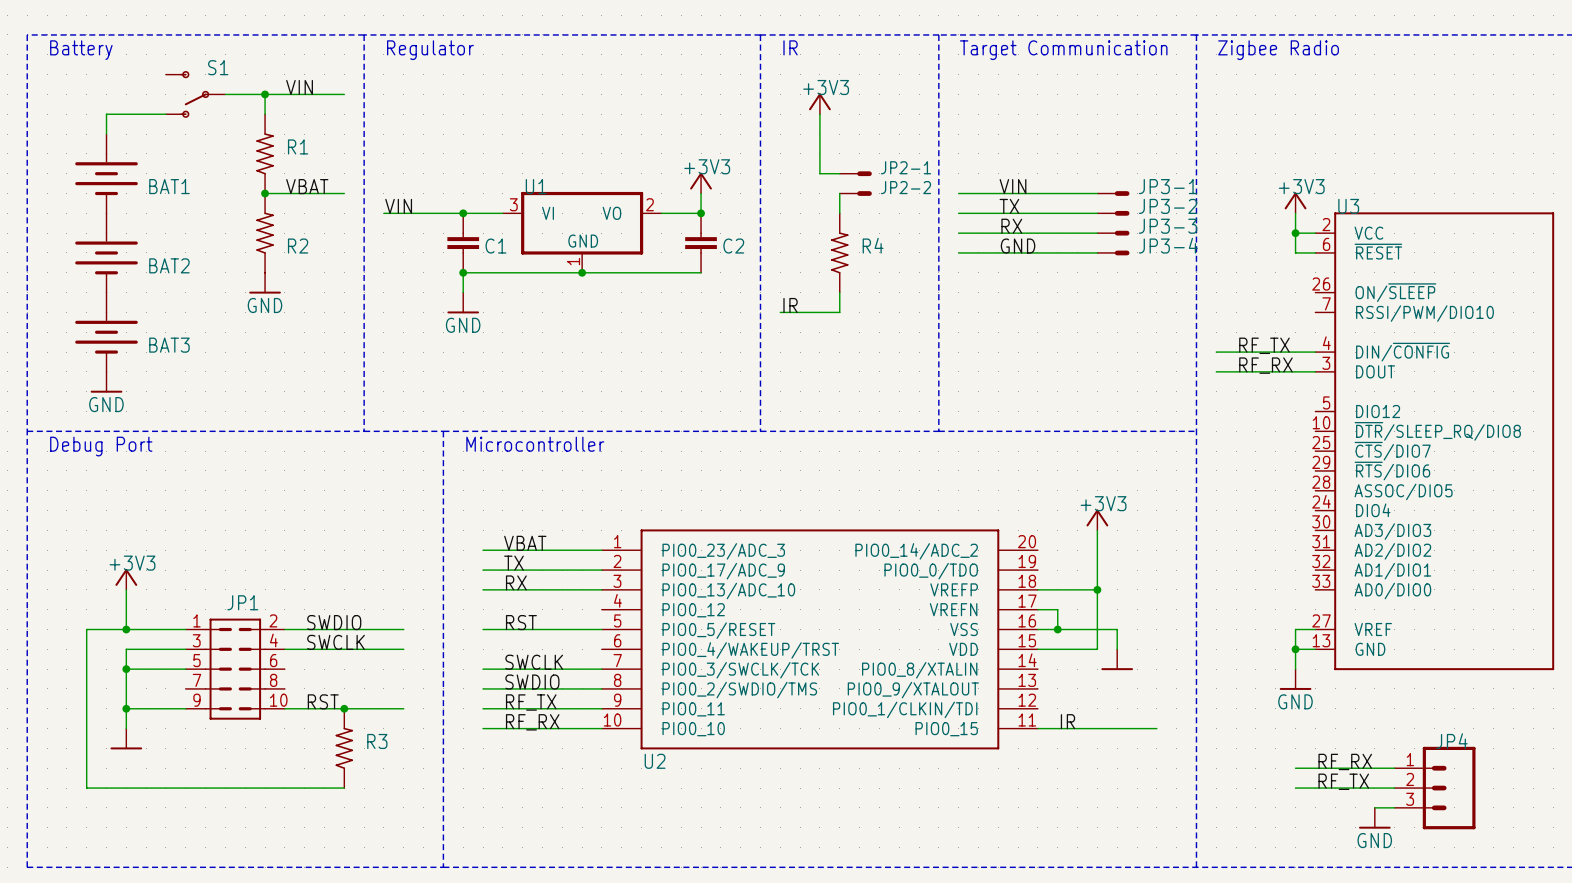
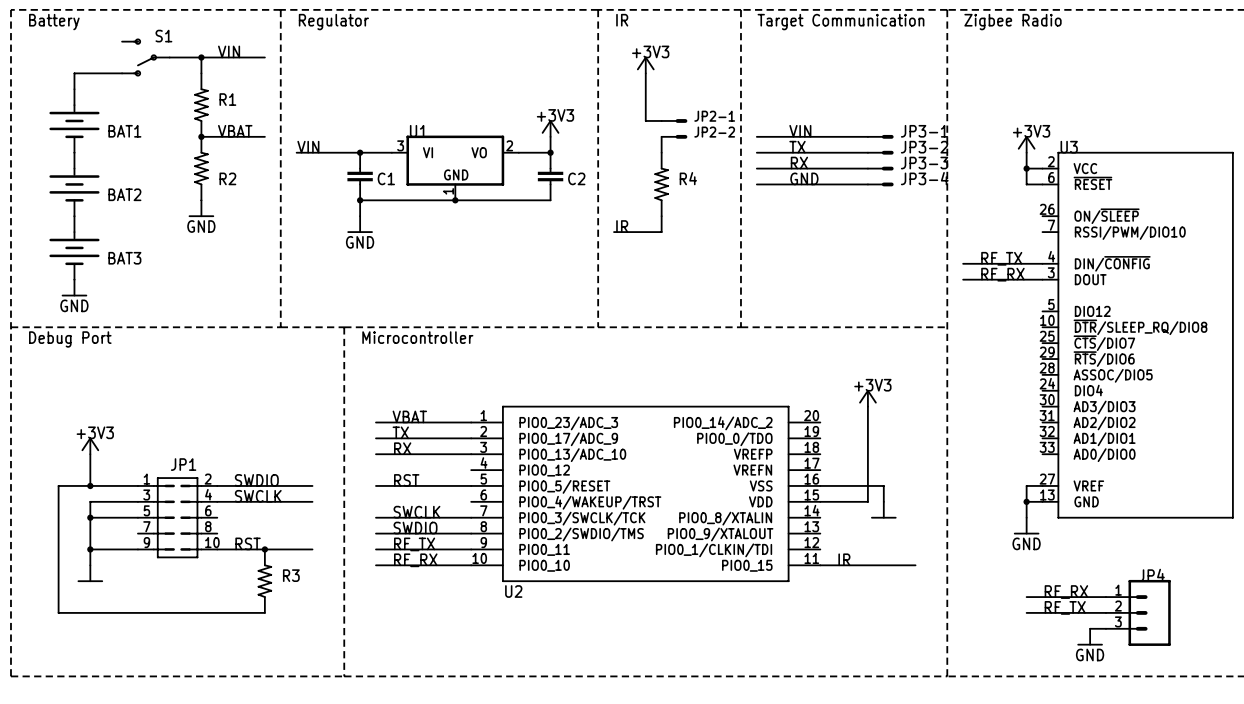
wire: (1037, 589) (1097, 589) -> none
junction: (1097, 589) -> none
wire: (1037, 609) (1057, 609) (1057, 629) -> none
junction: (1057, 629) -> none

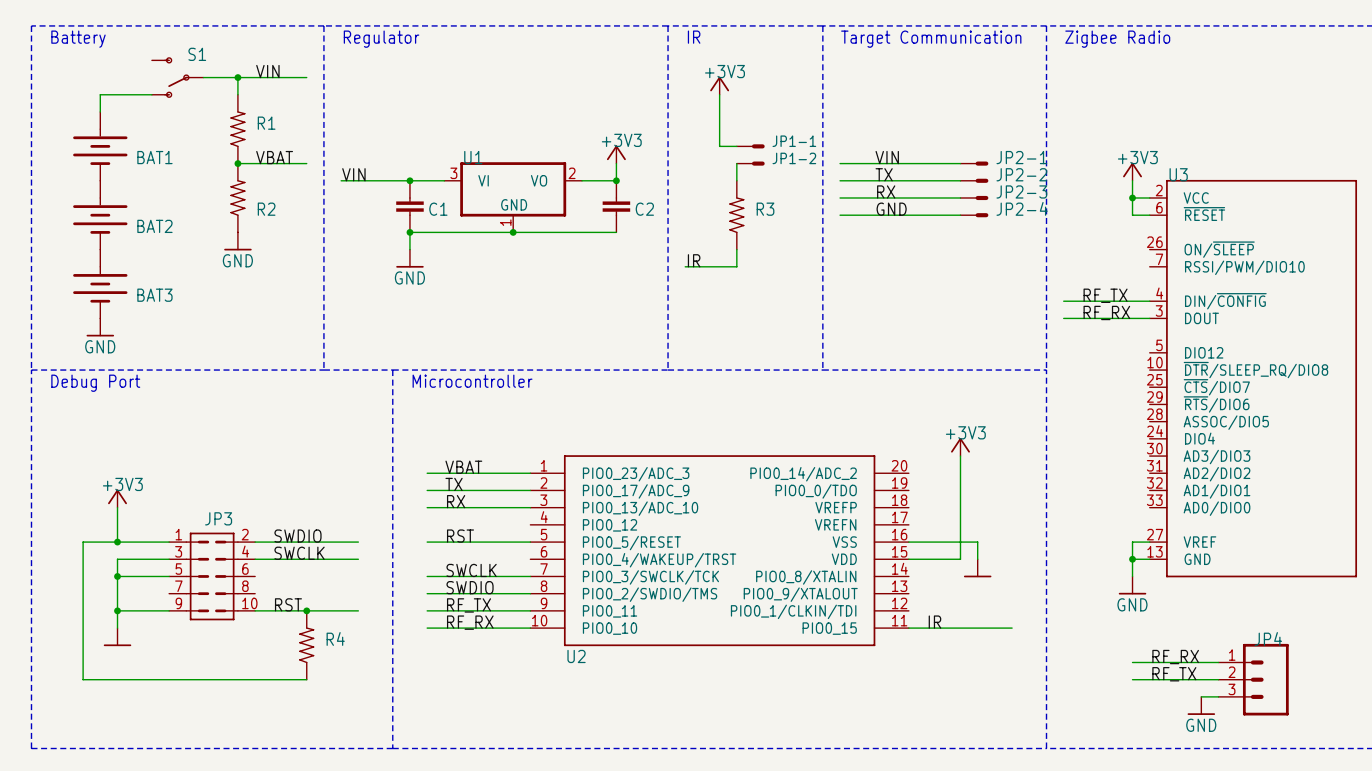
JP2-1 name: JP2-1 (714, 116) -> JP1-1 (794, 141)
JP3-1 name: JP3-1 (924, 131) -> JP2-1 (1021, 157)
JP2-2 name: JP2-2 (714, 132) -> JP1-2 (794, 158)
JP3-2 name: JP3-2 (924, 147) -> JP2-2 (1021, 174)
JP3-3 name: JP3-3 (924, 163) -> JP2-3 (1021, 191)
R4 name: R4 (688, 178) -> R3 (765, 209)
JP3-4 name: JP3-4 (924, 178) -> JP2-4 (1022, 208)
JP1 name: JP1 (183, 464) -> JP3 (218, 518)
R3 name: R3 (291, 575) -> R4 (335, 638)

